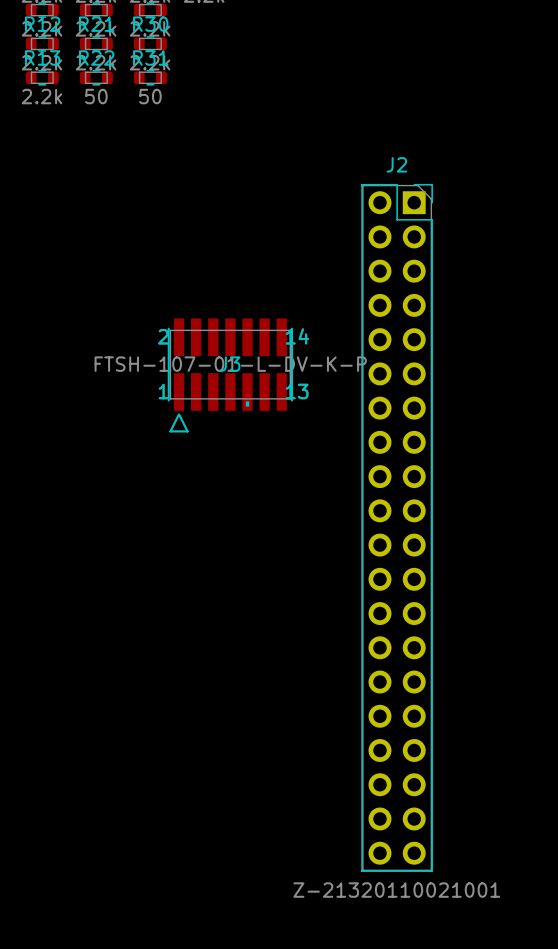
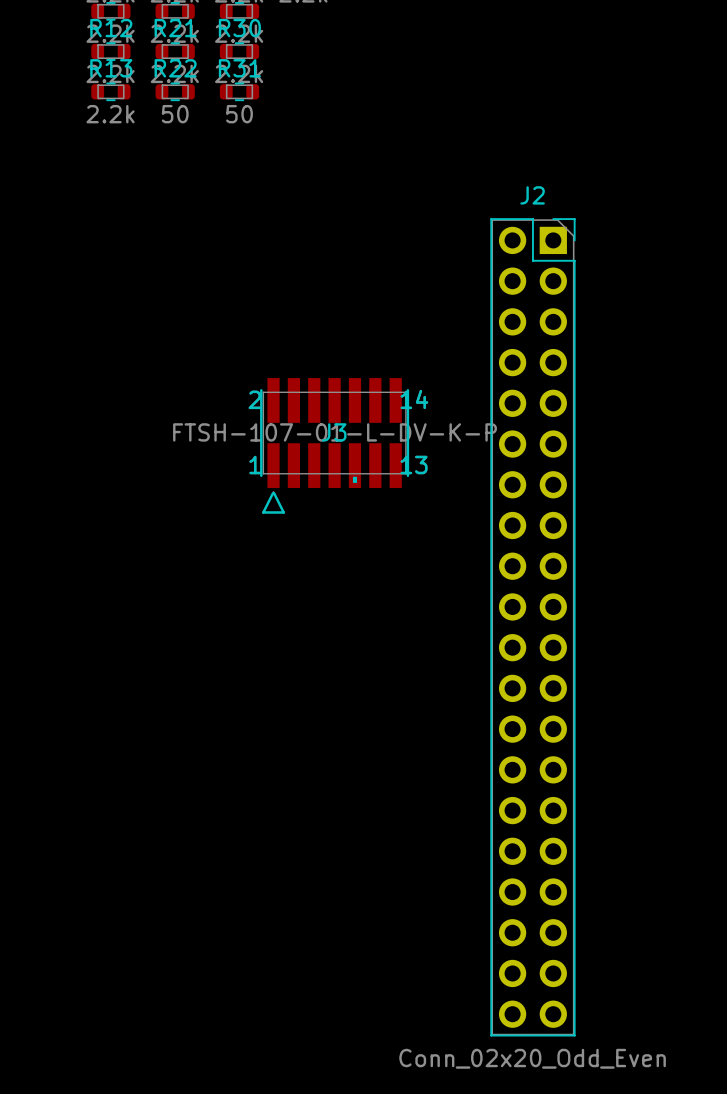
J2 value: Z-21320110021001 (396, 890) -> Conn_02x20_Odd_Even (532, 1058)

